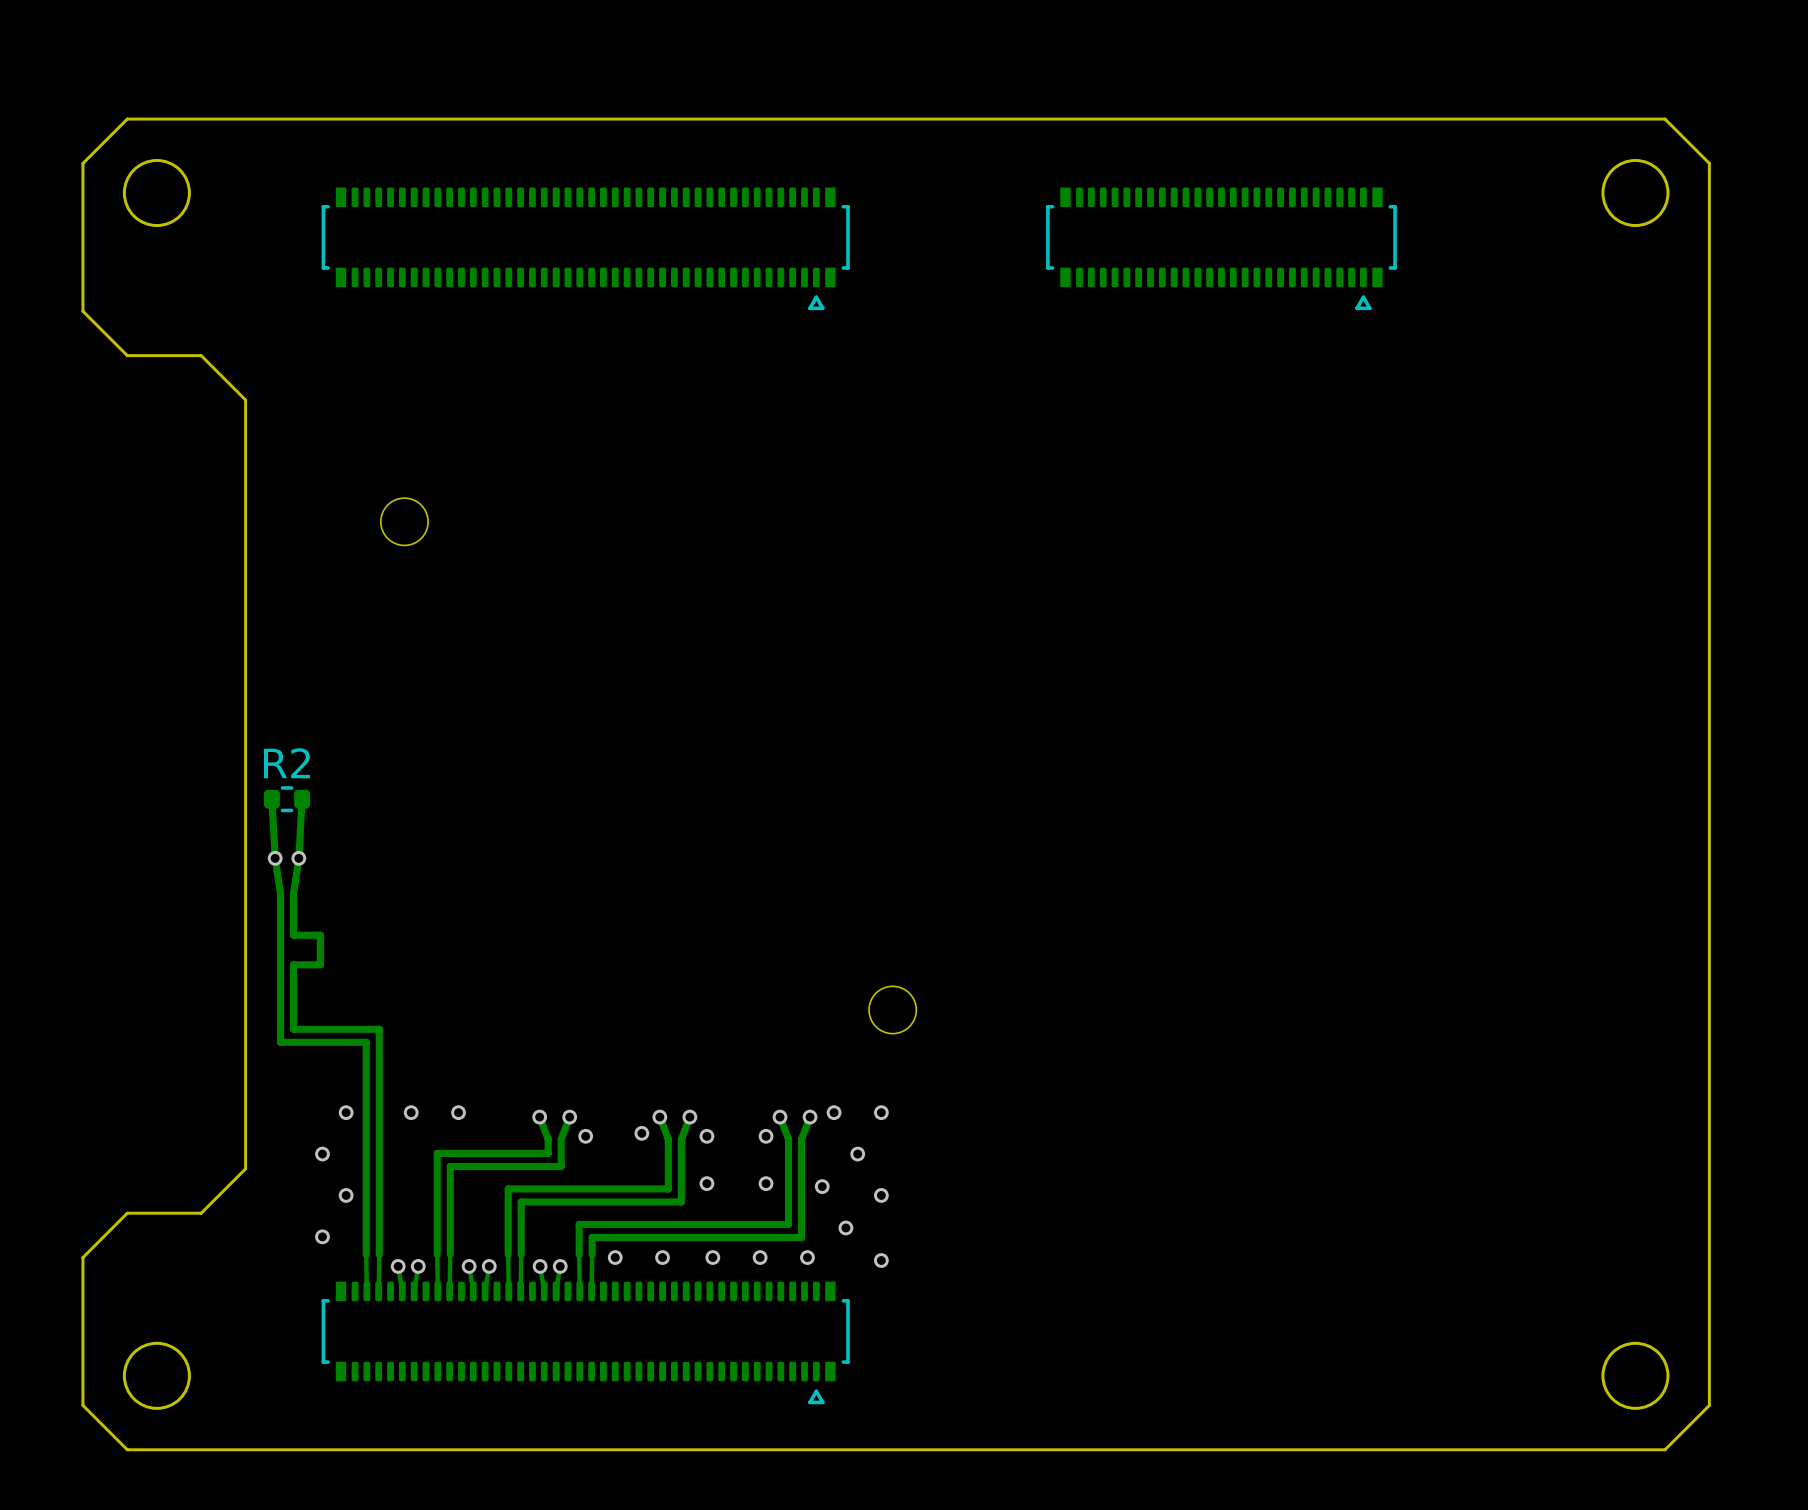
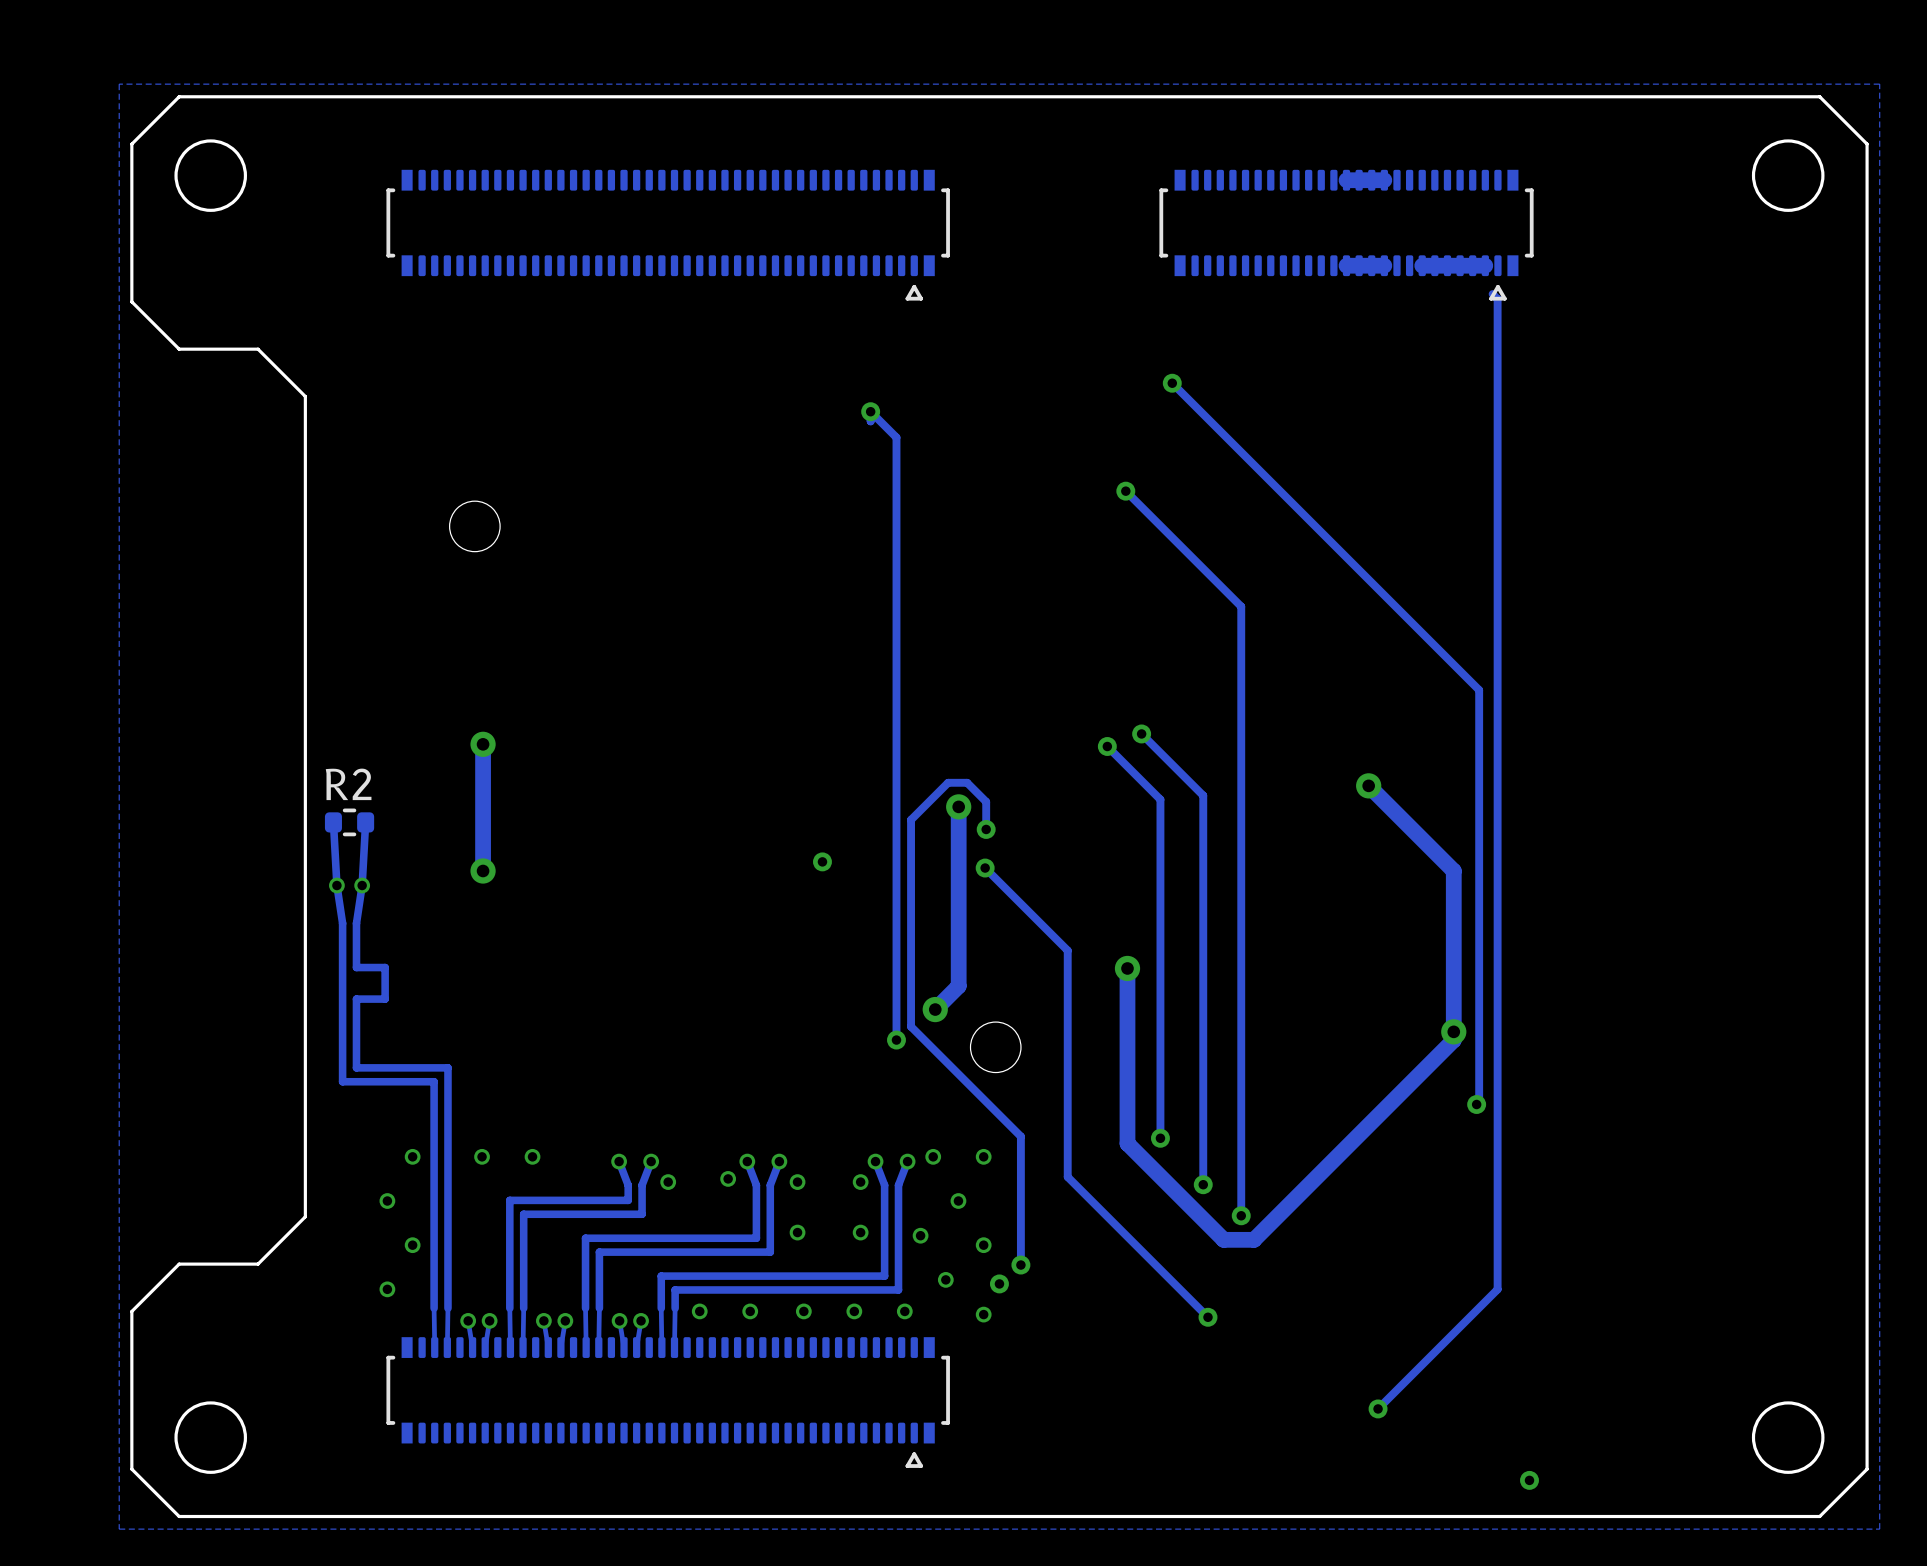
zone outline: none -> (1879, 84) (119, 84) (119, 1529) (1879, 1529) (1879, 84)
track: none -> (1384, 180) (1346, 180)
track: none -> (1384, 265) (1346, 265)
track: none -> (1485, 265) (1422, 265)
track: none -> (1492, 294) (1497, 299) (1497, 1289) (1378, 1408)
track: none -> (1172, 383) (1479, 690) (1479, 1101) (1476, 1104)
via: none -> (1172, 383)
via: none -> (870, 411)
track: none -> (870, 421) (870, 411) (896, 437) (896, 1040)
track: none -> (1125, 491) (1241, 606) (1241, 1215)
via: none -> (1125, 491)
track: none -> (1141, 733) (1203, 795) (1203, 1184)
via: none -> (1141, 733)
track: none -> (483, 744) (483, 871)
via: none -> (483, 744)
track: none -> (1107, 746) (1160, 799) (1160, 1138)
via: none -> (1107, 746)
track: none -> (1368, 785) (1453, 870) (1453, 1040) (1254, 1239) (1223, 1239) (1127, 1143) (1127, 968)
via: none -> (1368, 785)
track: none -> (958, 806) (958, 986) (935, 1009)
via: none -> (958, 806)
track: none -> (986, 829) (986, 801) (967, 782) (948, 782) (911, 819) (911, 1026) (1020, 1136) (1020, 1265)
via: none -> (986, 829)
via: none -> (822, 861)
track: none -> (985, 868) (1067, 950) (1067, 1177) (1207, 1317)
via: none -> (985, 868)
via: none -> (483, 871)
via: none -> (1127, 968)
via: none -> (935, 1009)
via: none -> (1453, 1031)
via: none -> (896, 1040)
via: none -> (1476, 1104)
via: none -> (1160, 1138)
via: none -> (1203, 1184)
via: none -> (1241, 1215)
via: none -> (1020, 1265)
via: none -> (999, 1283)
via: none -> (1207, 1317)
via: none -> (1378, 1408)
via: none -> (1529, 1480)

